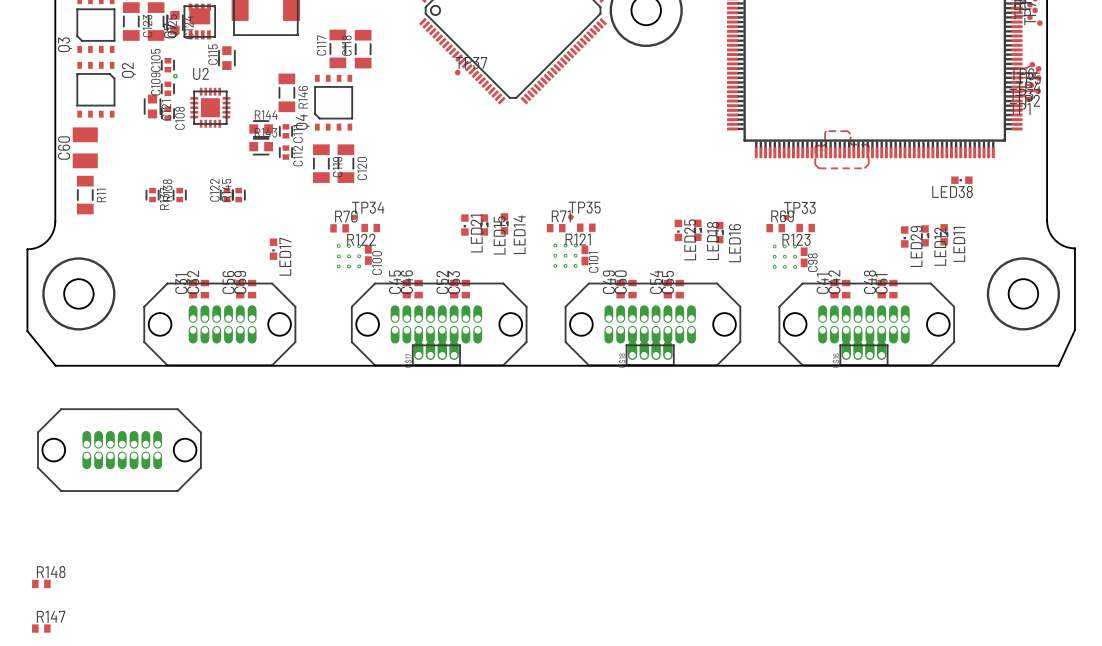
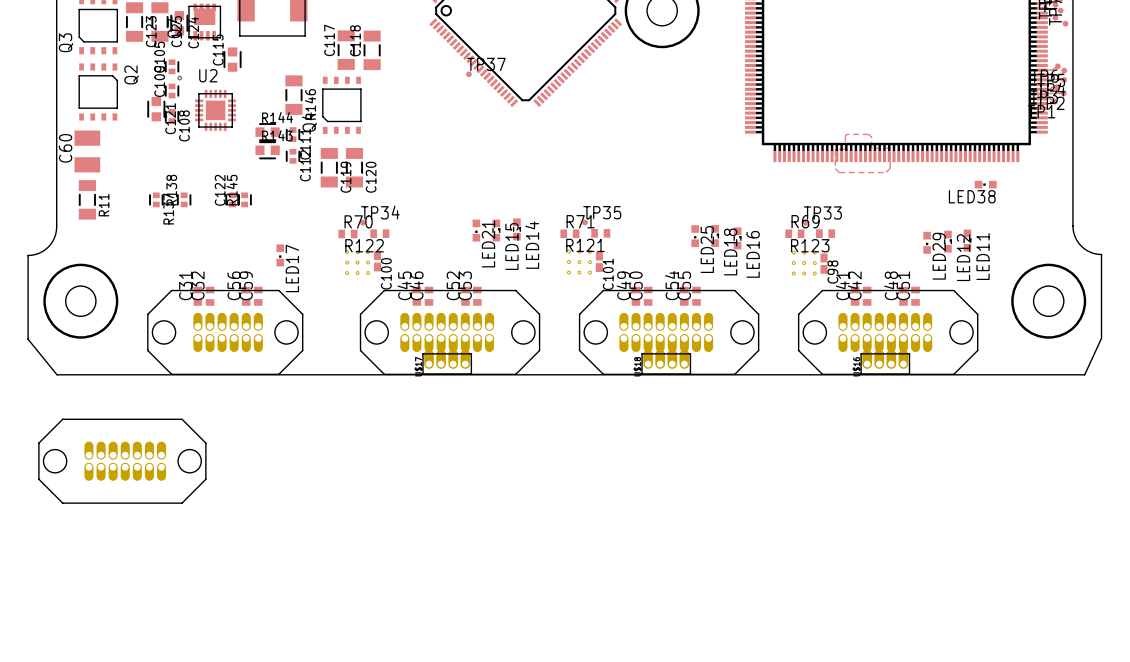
R148: (41, 583) -> none
R147: (41, 628) -> none

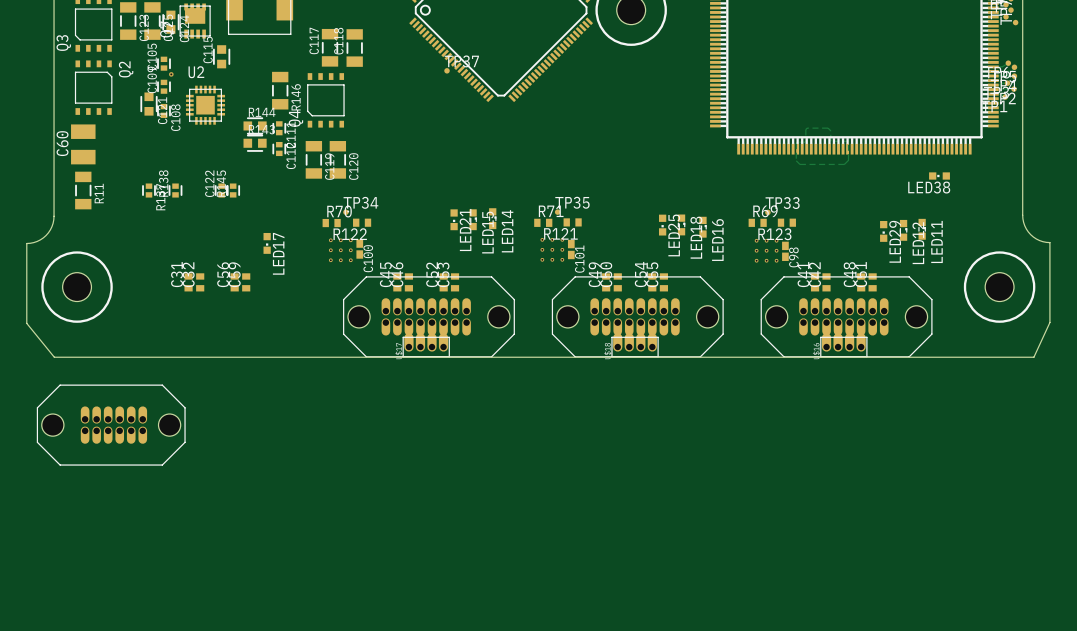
part position: (225, 332) -> (111, 425)
part: (122, 461) -> none

